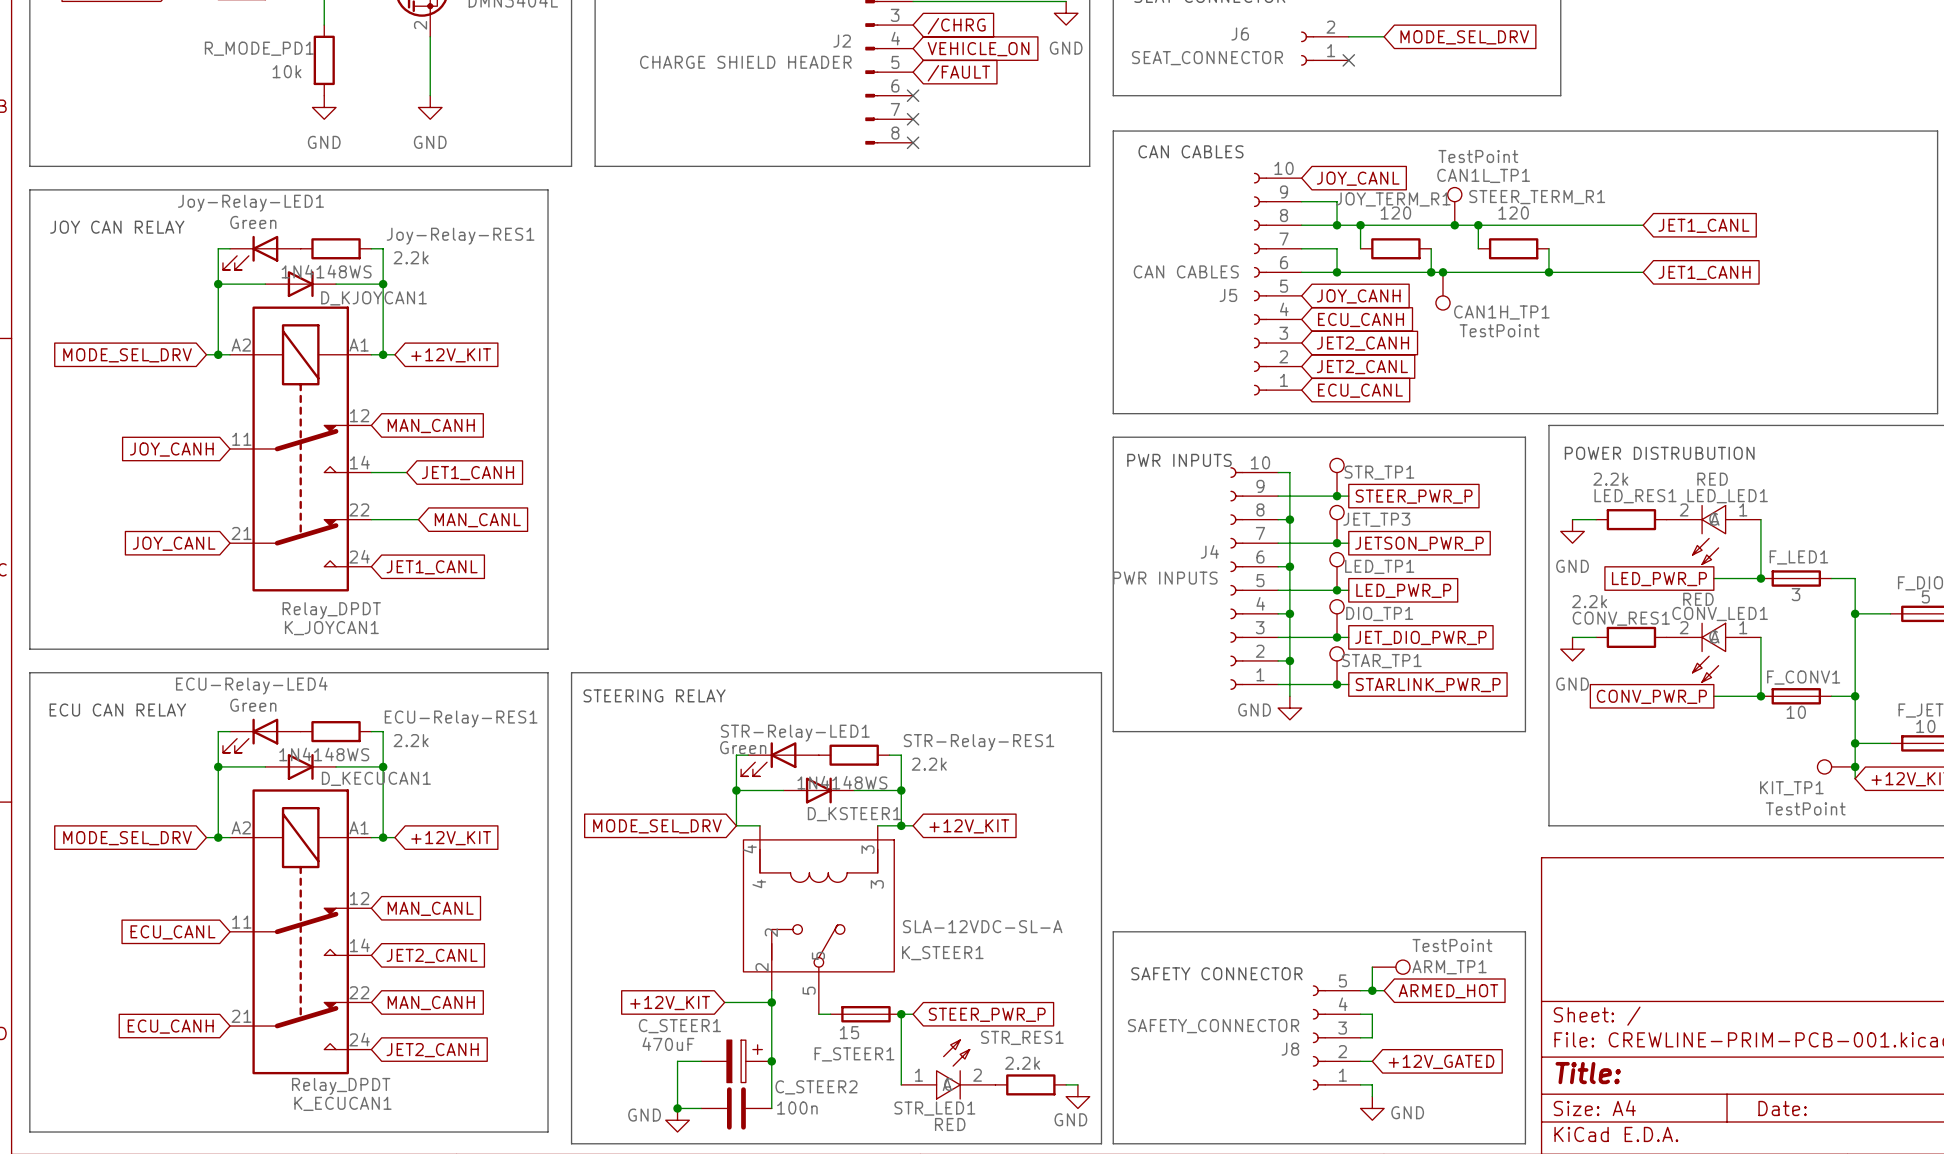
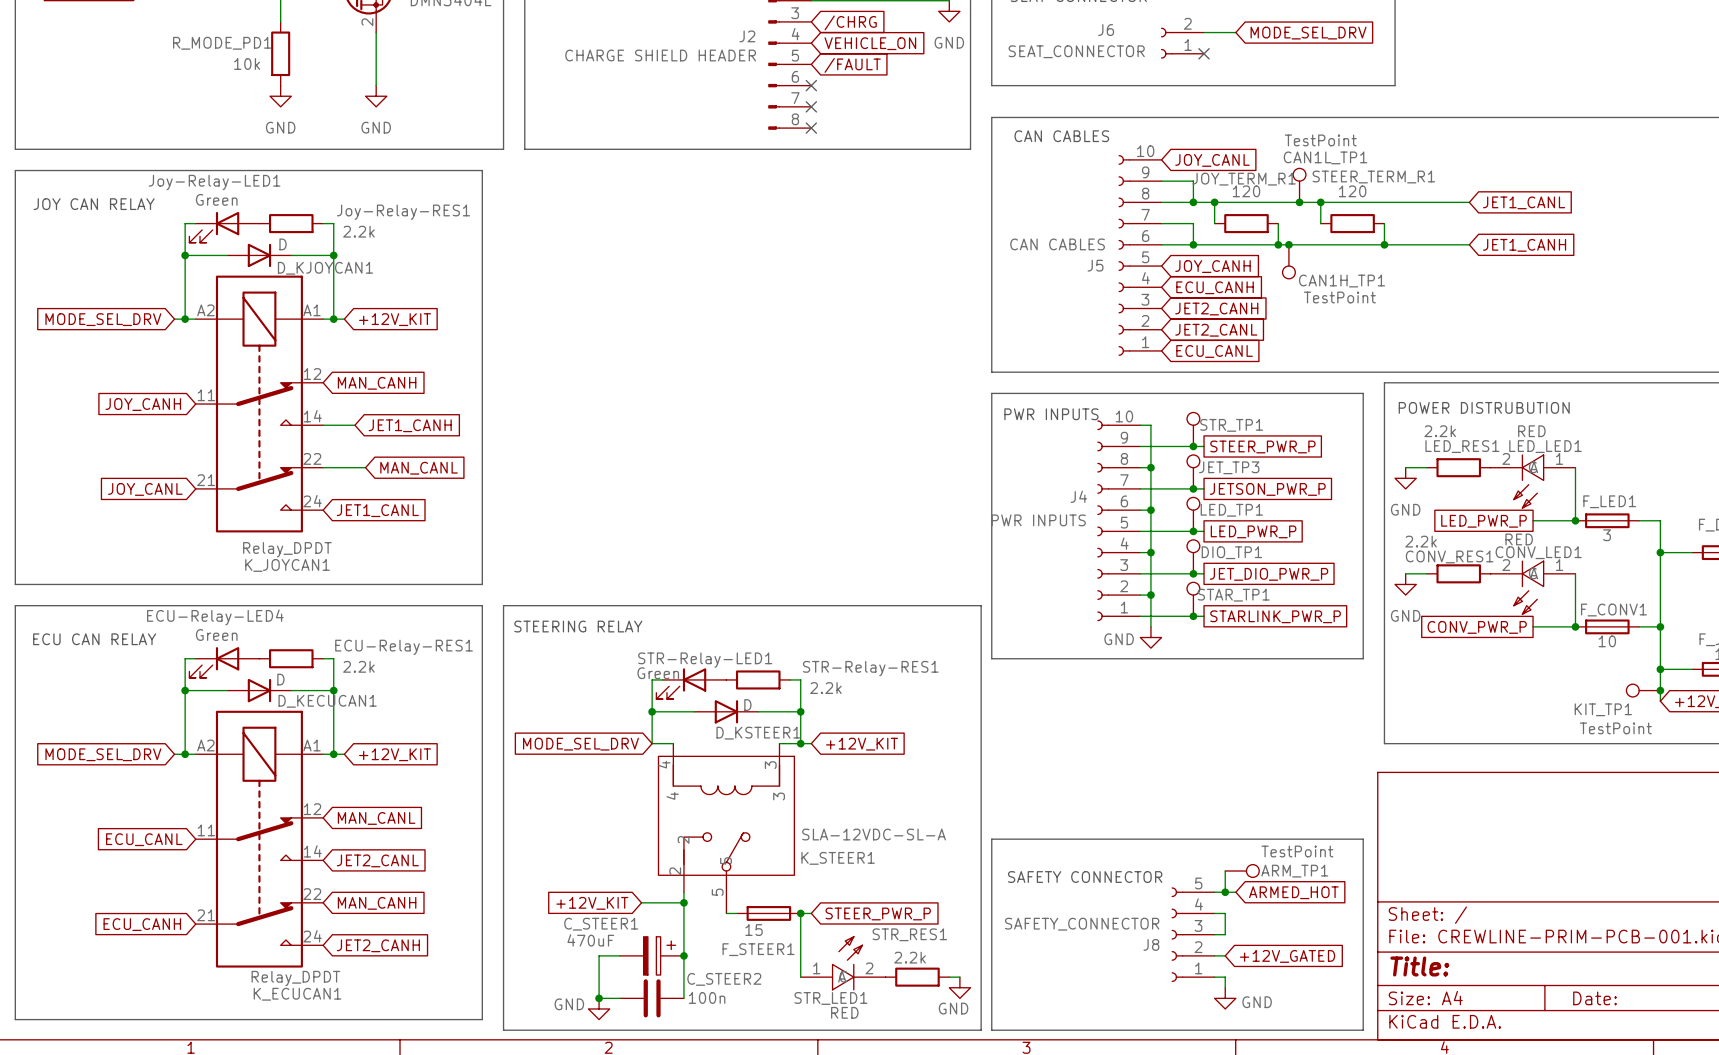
D_KJOYCAN1 value: 1N4148WS (326, 271) -> D (283, 244)
D_KECUCAN1 value: 1N4148WS (324, 754) -> D (280, 679)
D_KSTEER1 value: 1N4148WS (842, 782) -> D (747, 705)

